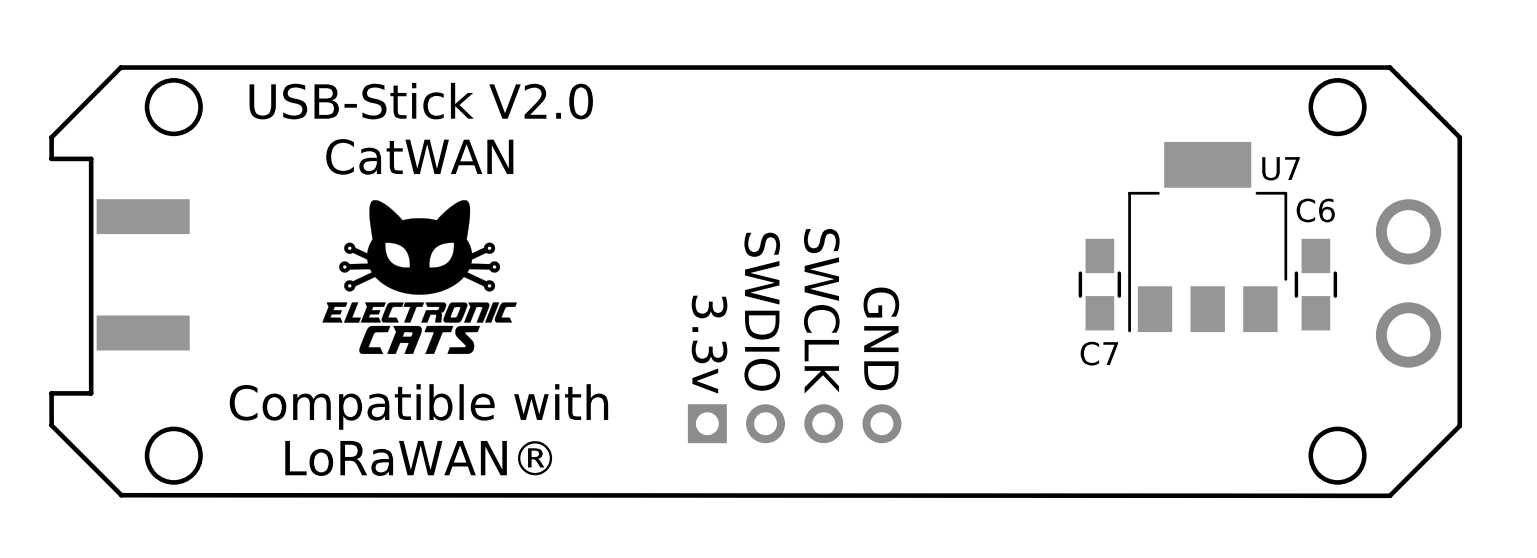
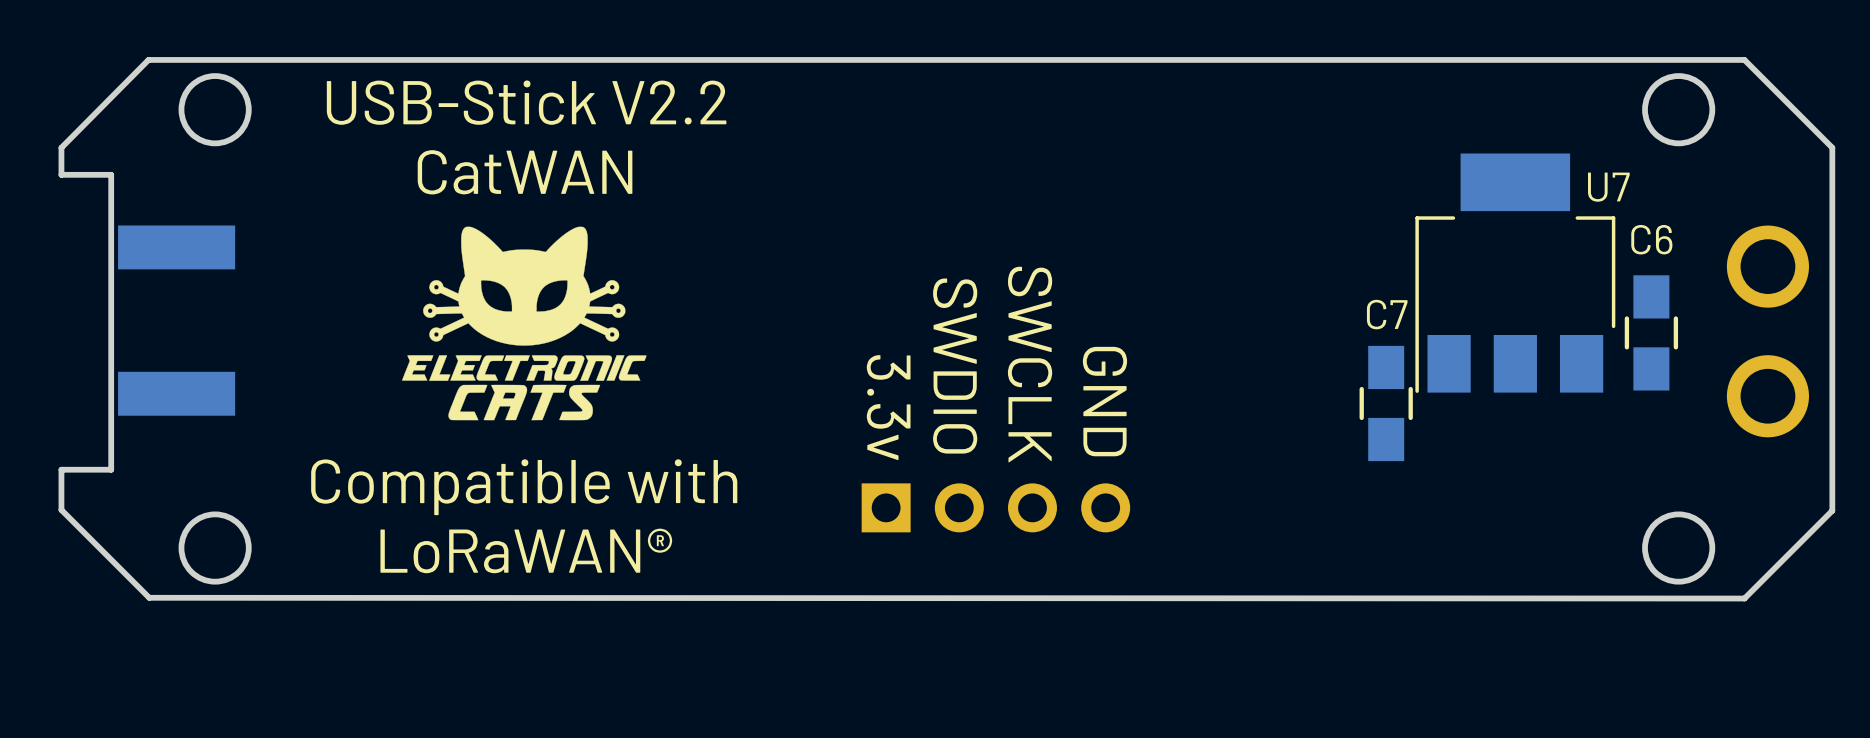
text: USB-Stick V2.0 (421, 101) -> USB-Stick V2.2 (526, 102)
C7 position: (1099, 284) -> (1386, 403)
C7 name position: C7 (1099, 353) -> C7 (1387, 314)

